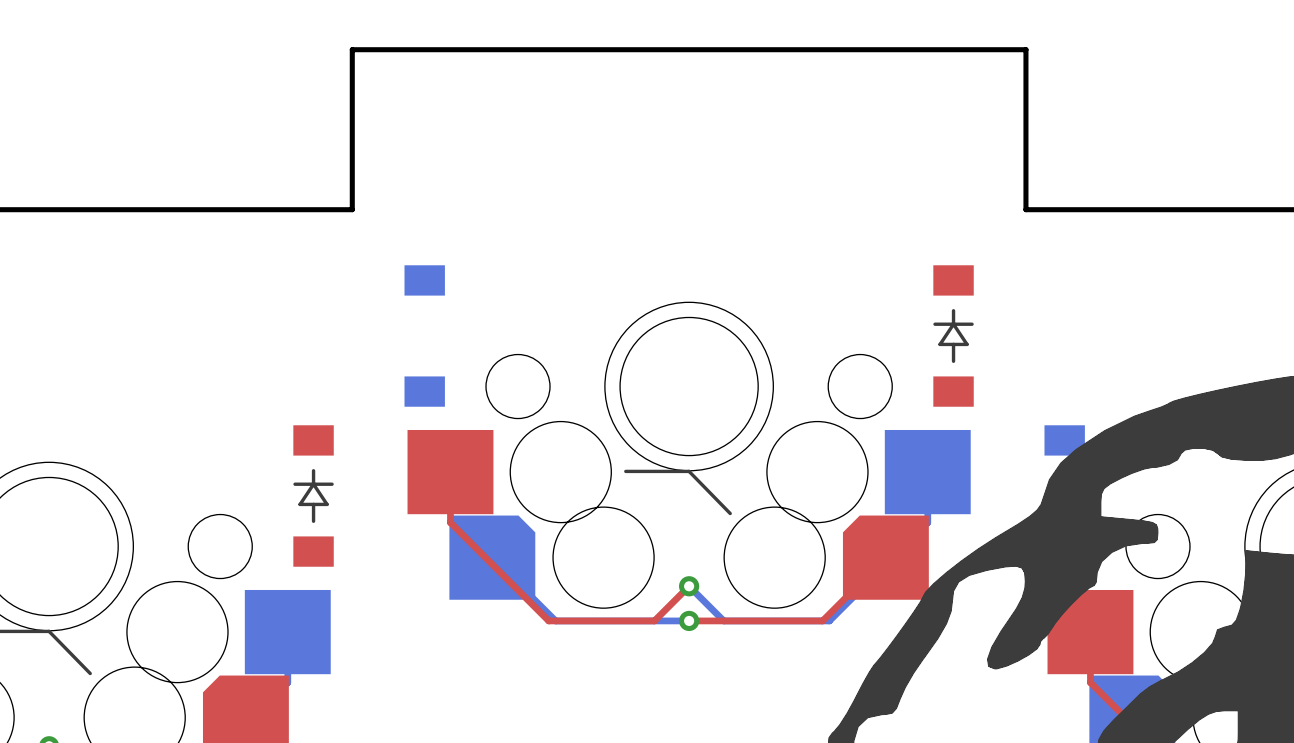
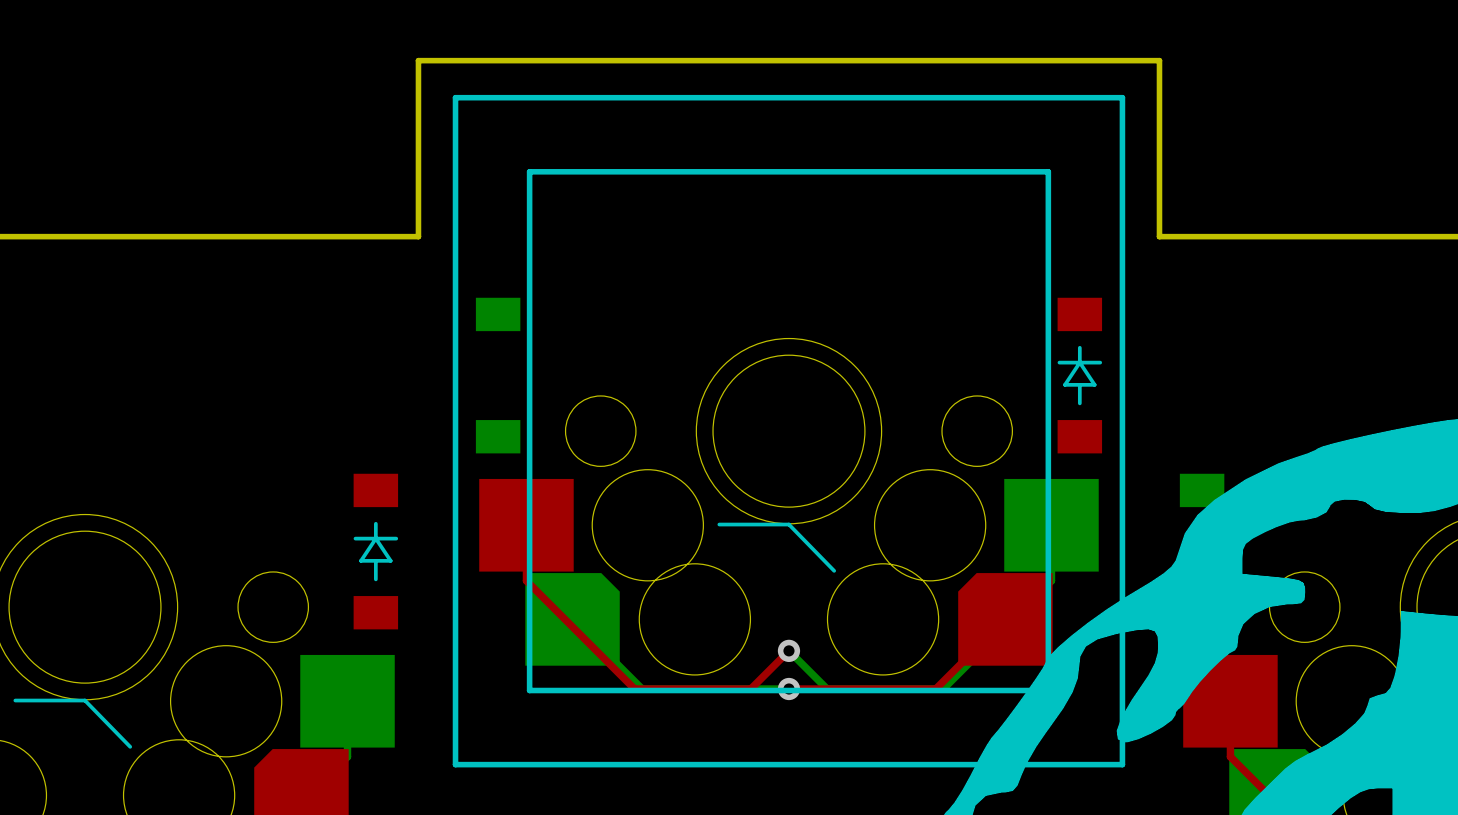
line: none -> (455, 97) (1122, 97) (1122, 764) (455, 764) (455, 97)
line: none -> (529, 171) (1048, 171) (1048, 690) (529, 690) (529, 171)

